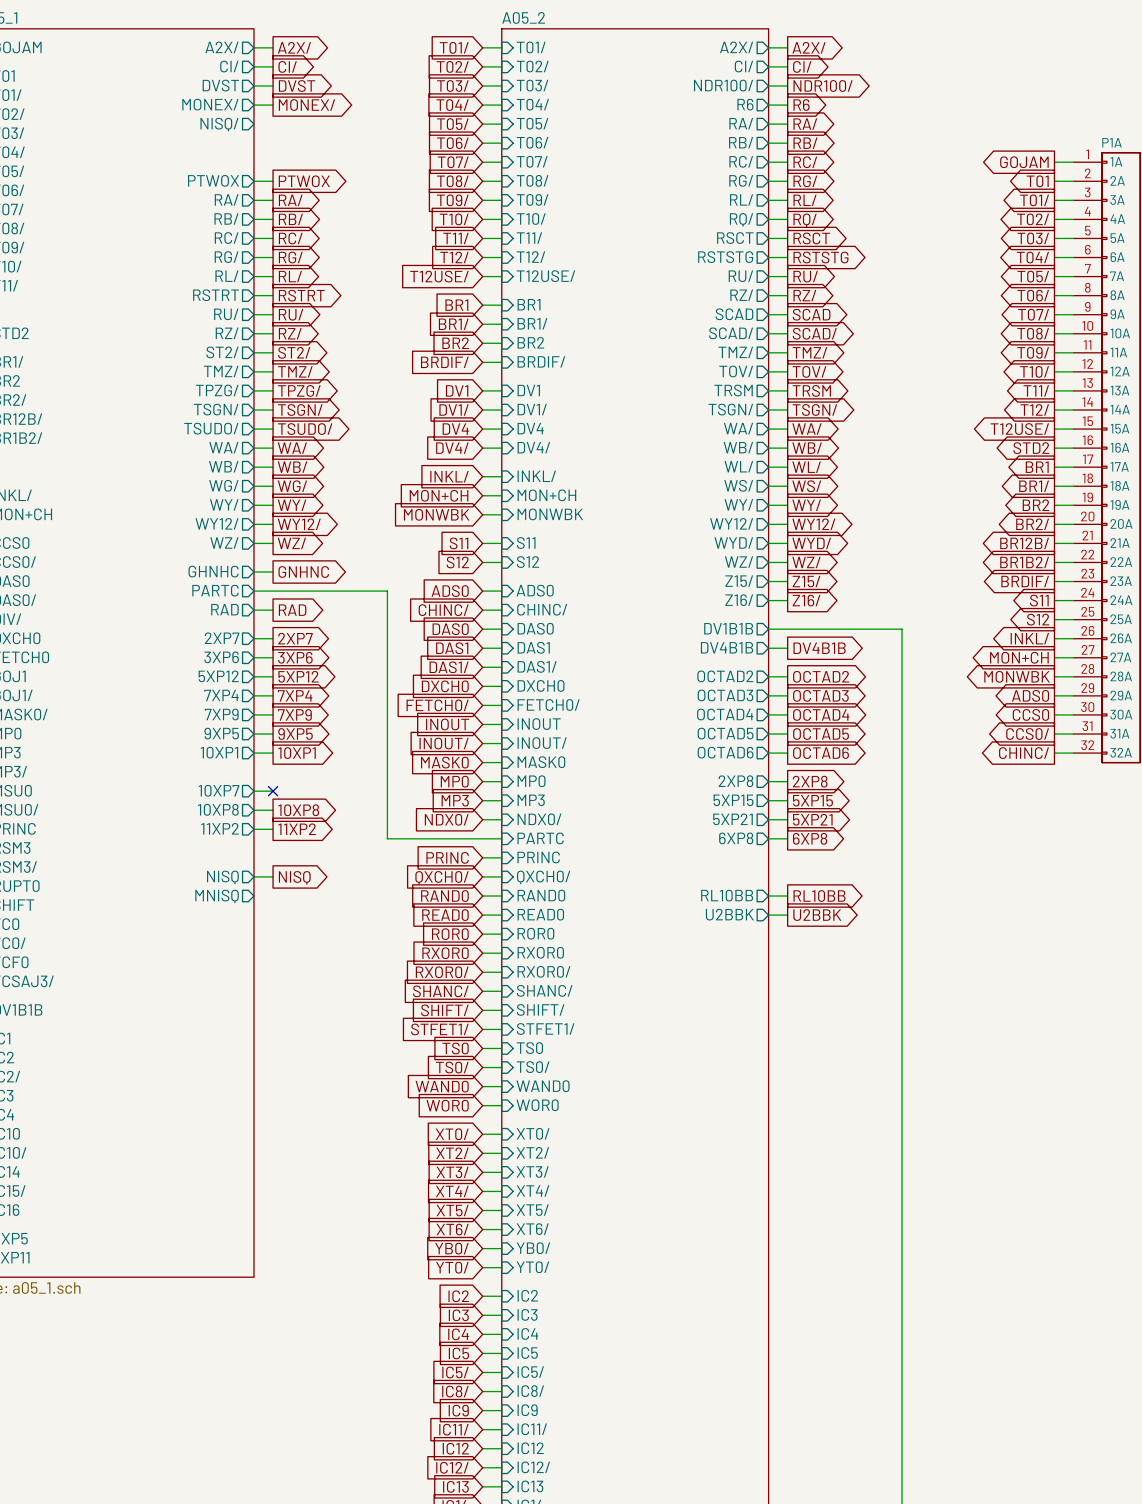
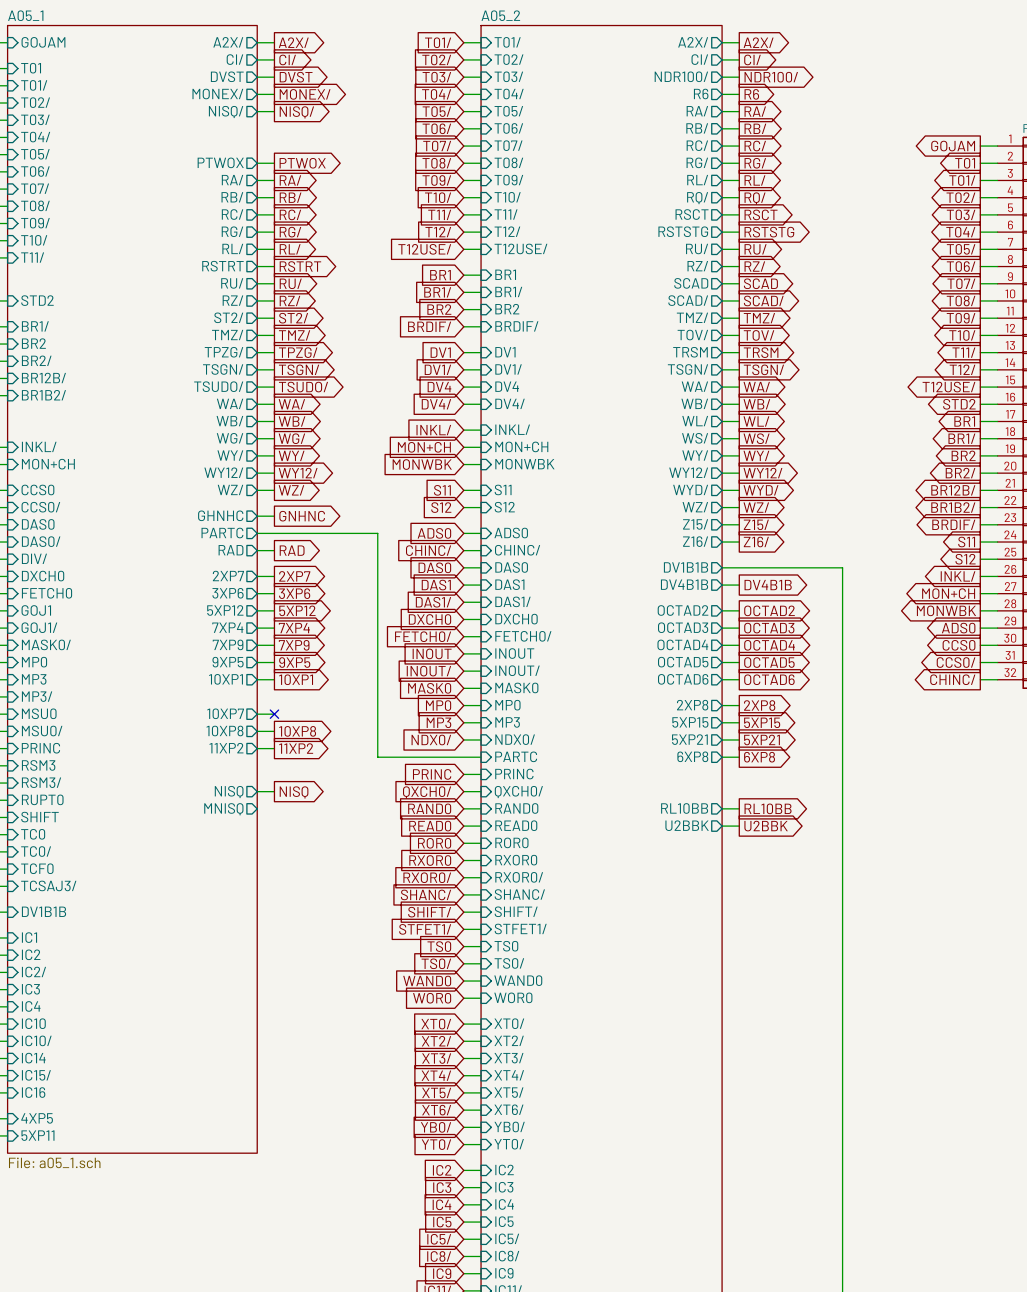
wire: none -> (257, 111) (274, 111)
global label: none -> NISQ/ (296, 112)

